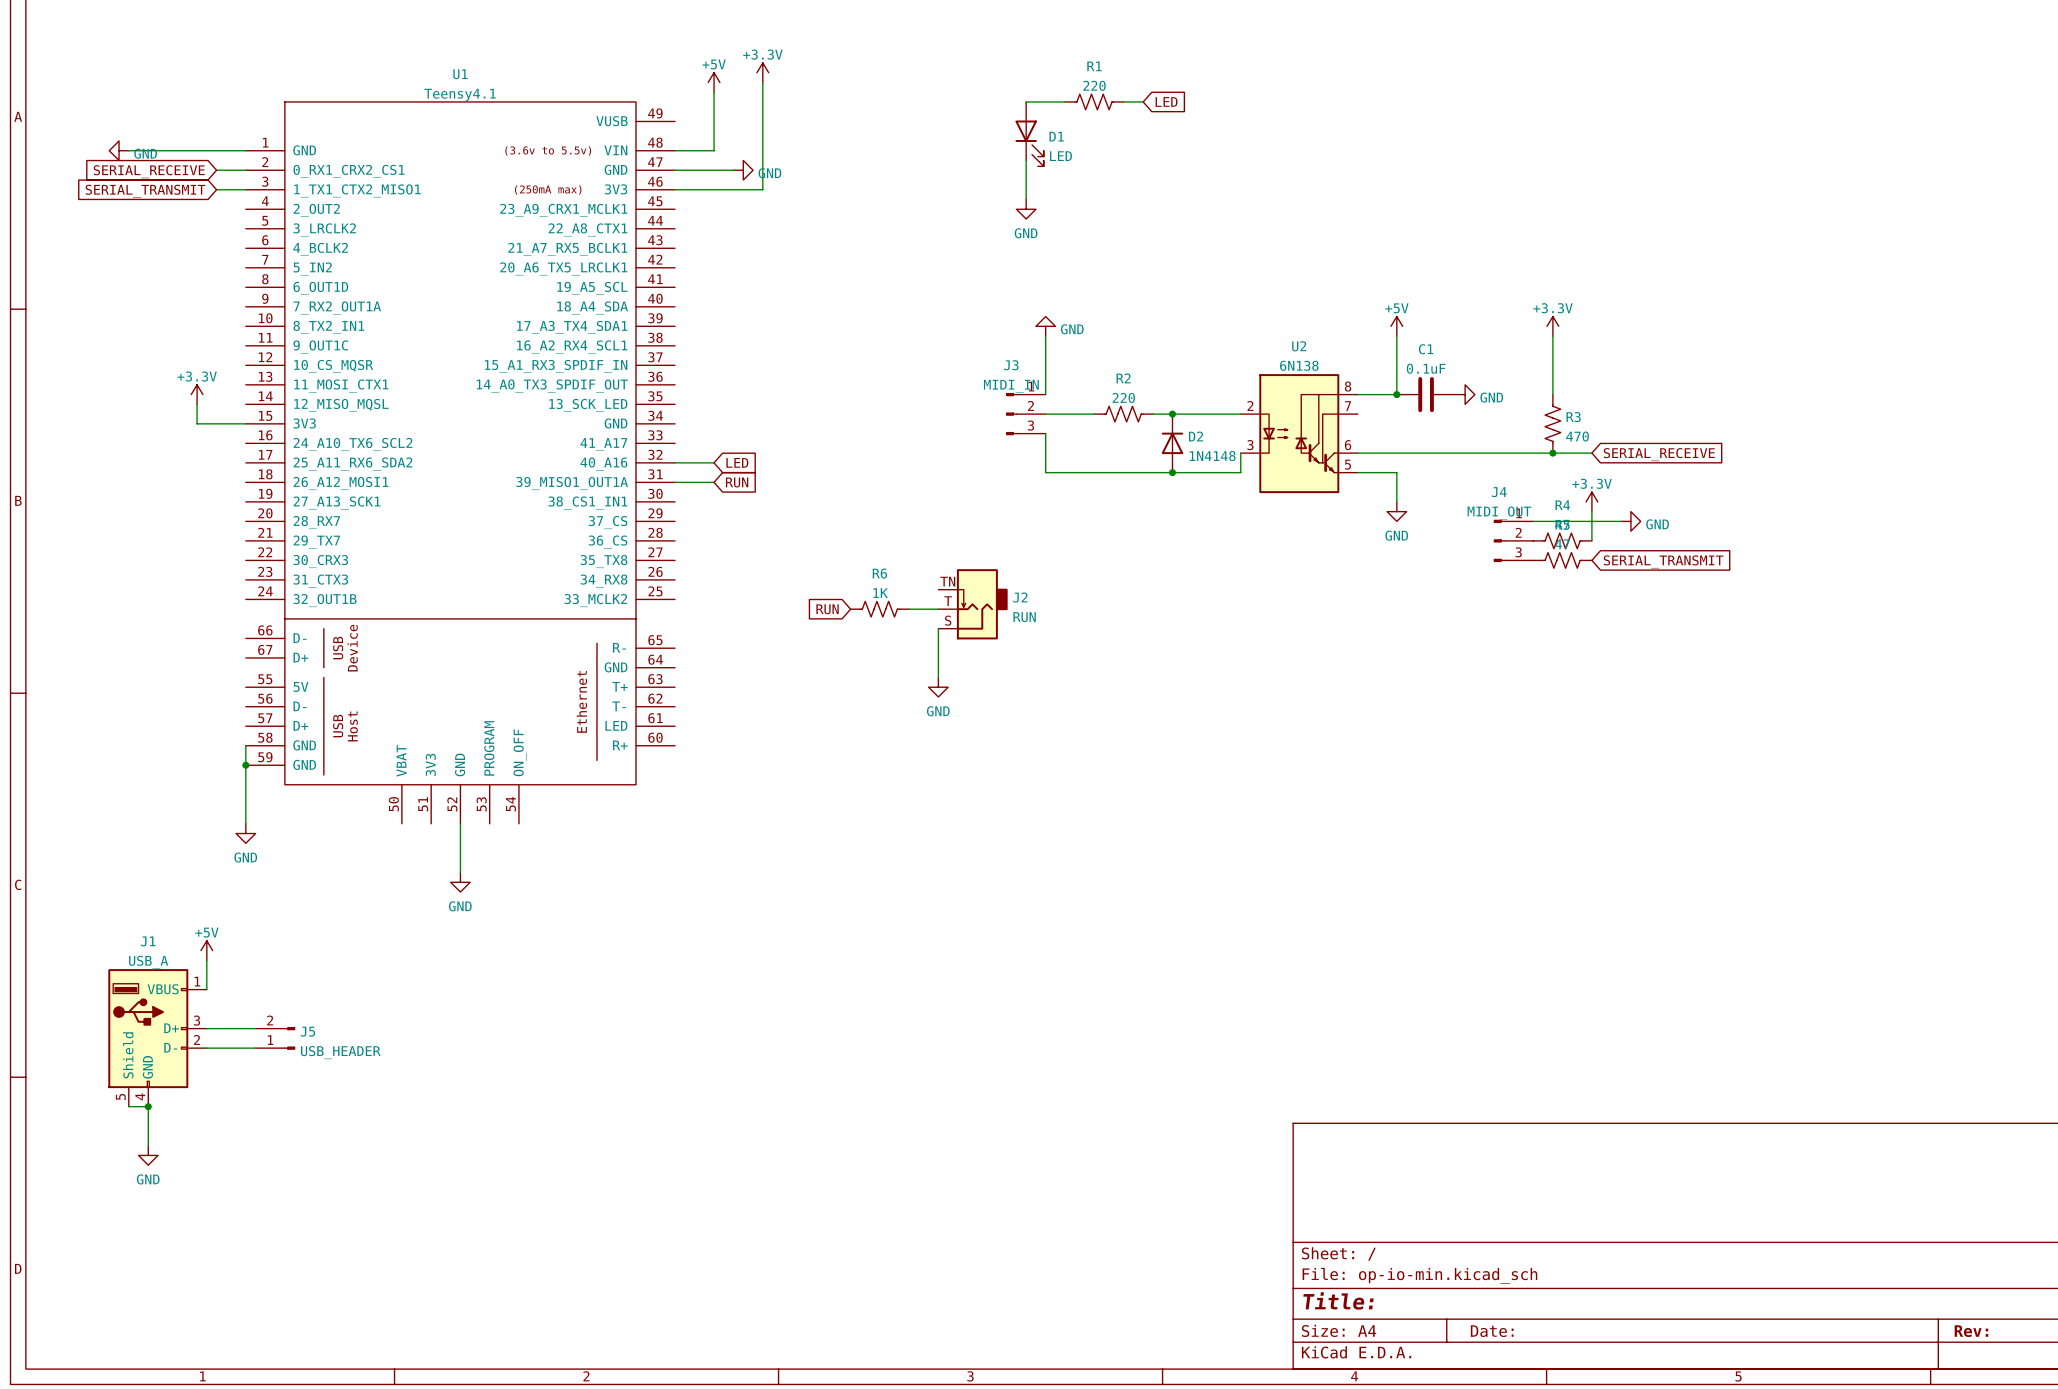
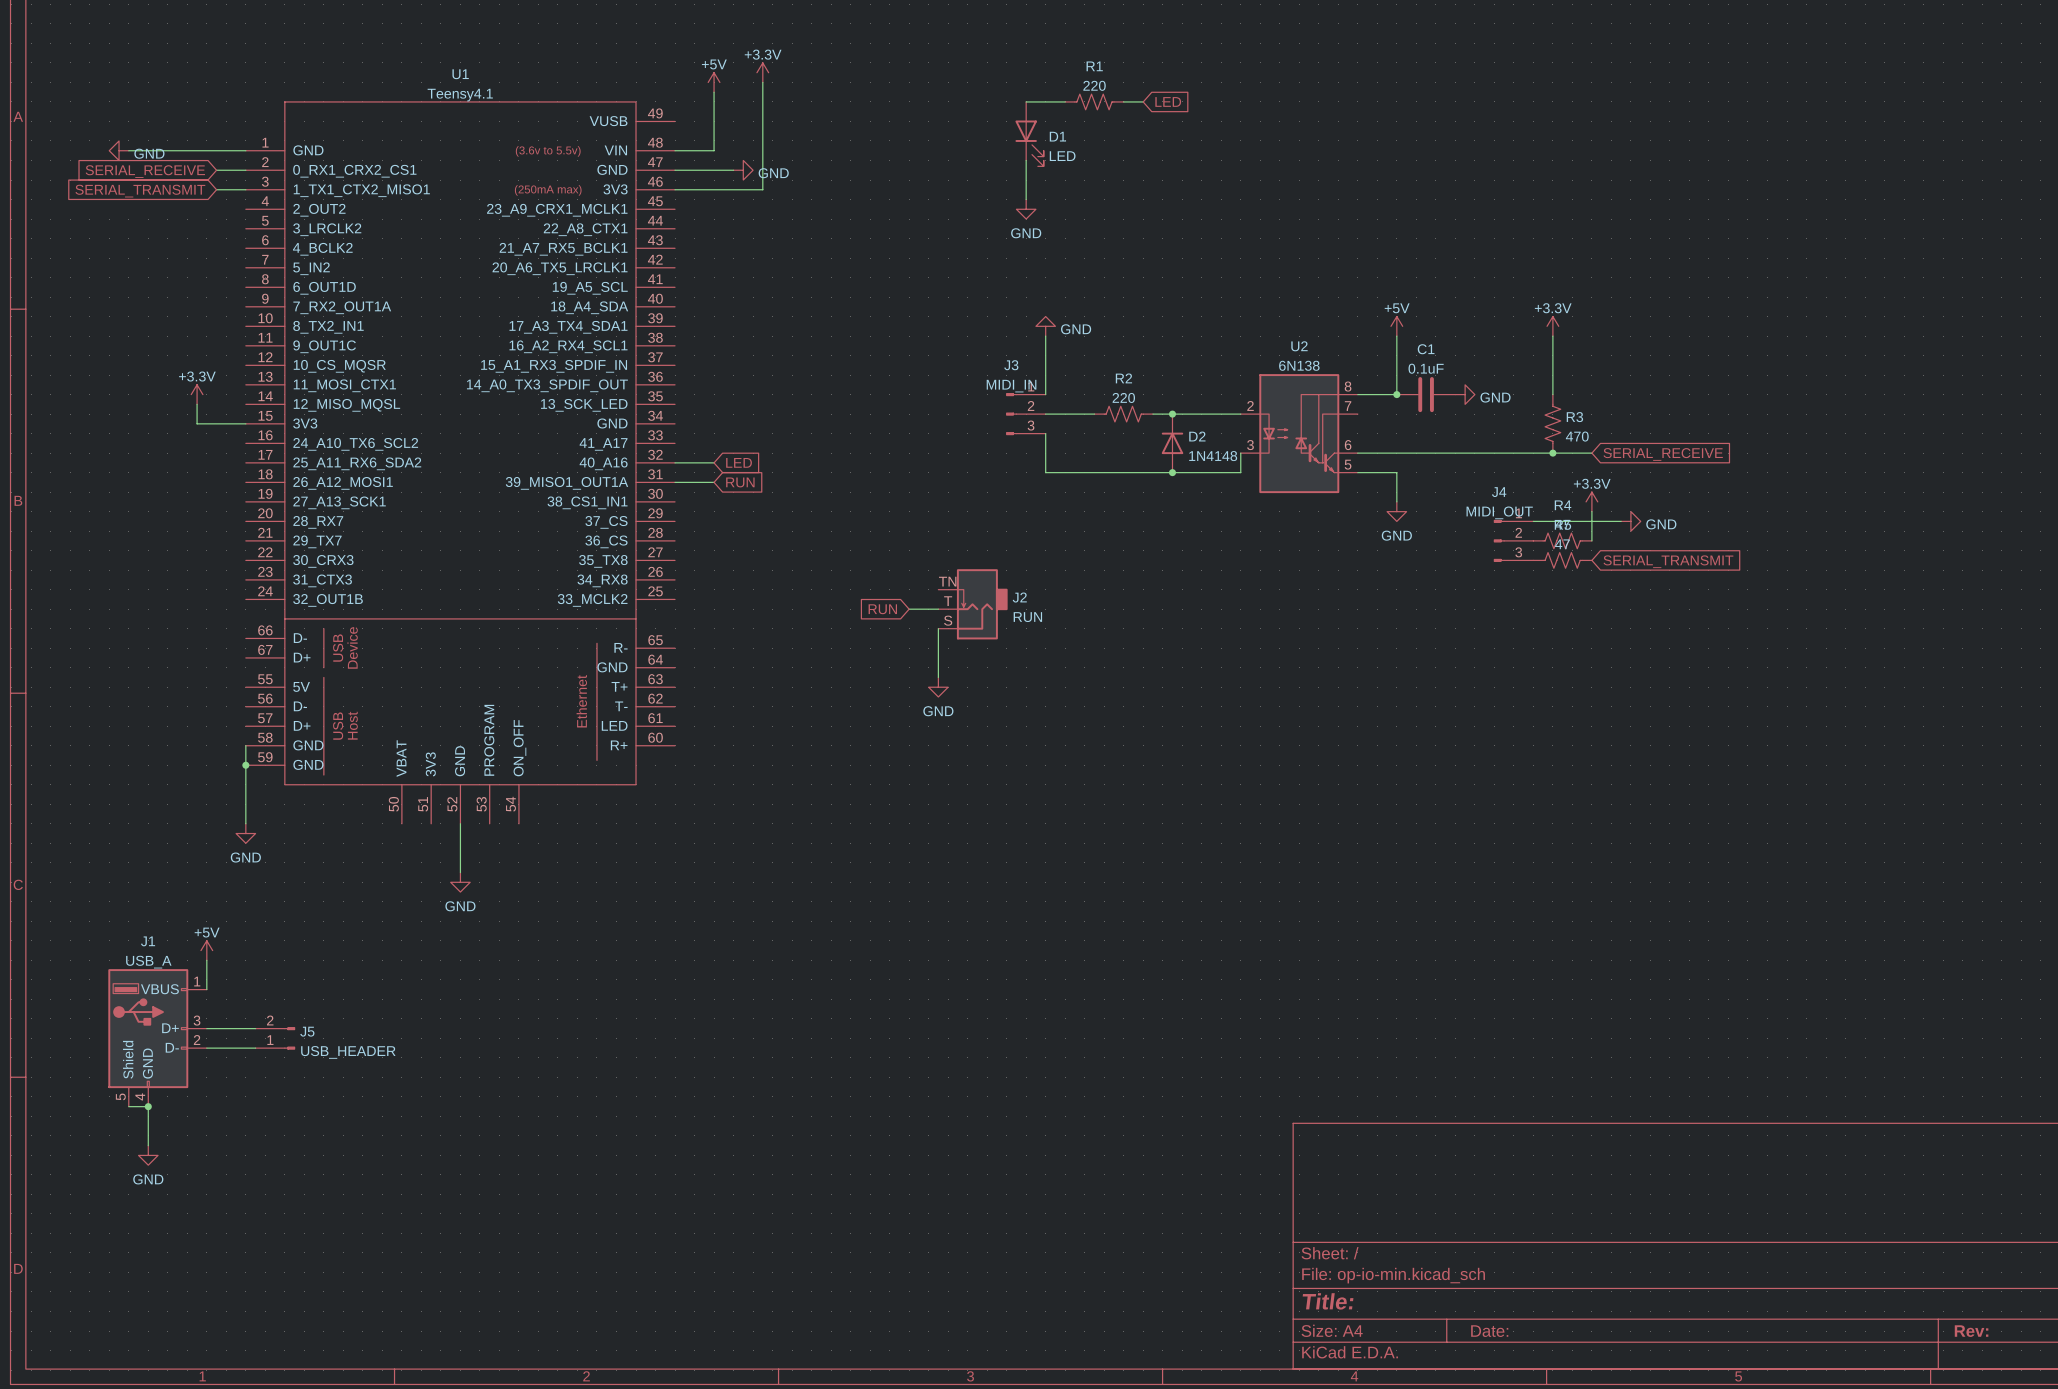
global label position: RUN (827, 609) -> RUN (882, 609)
R6: 1K (879, 609) -> none

